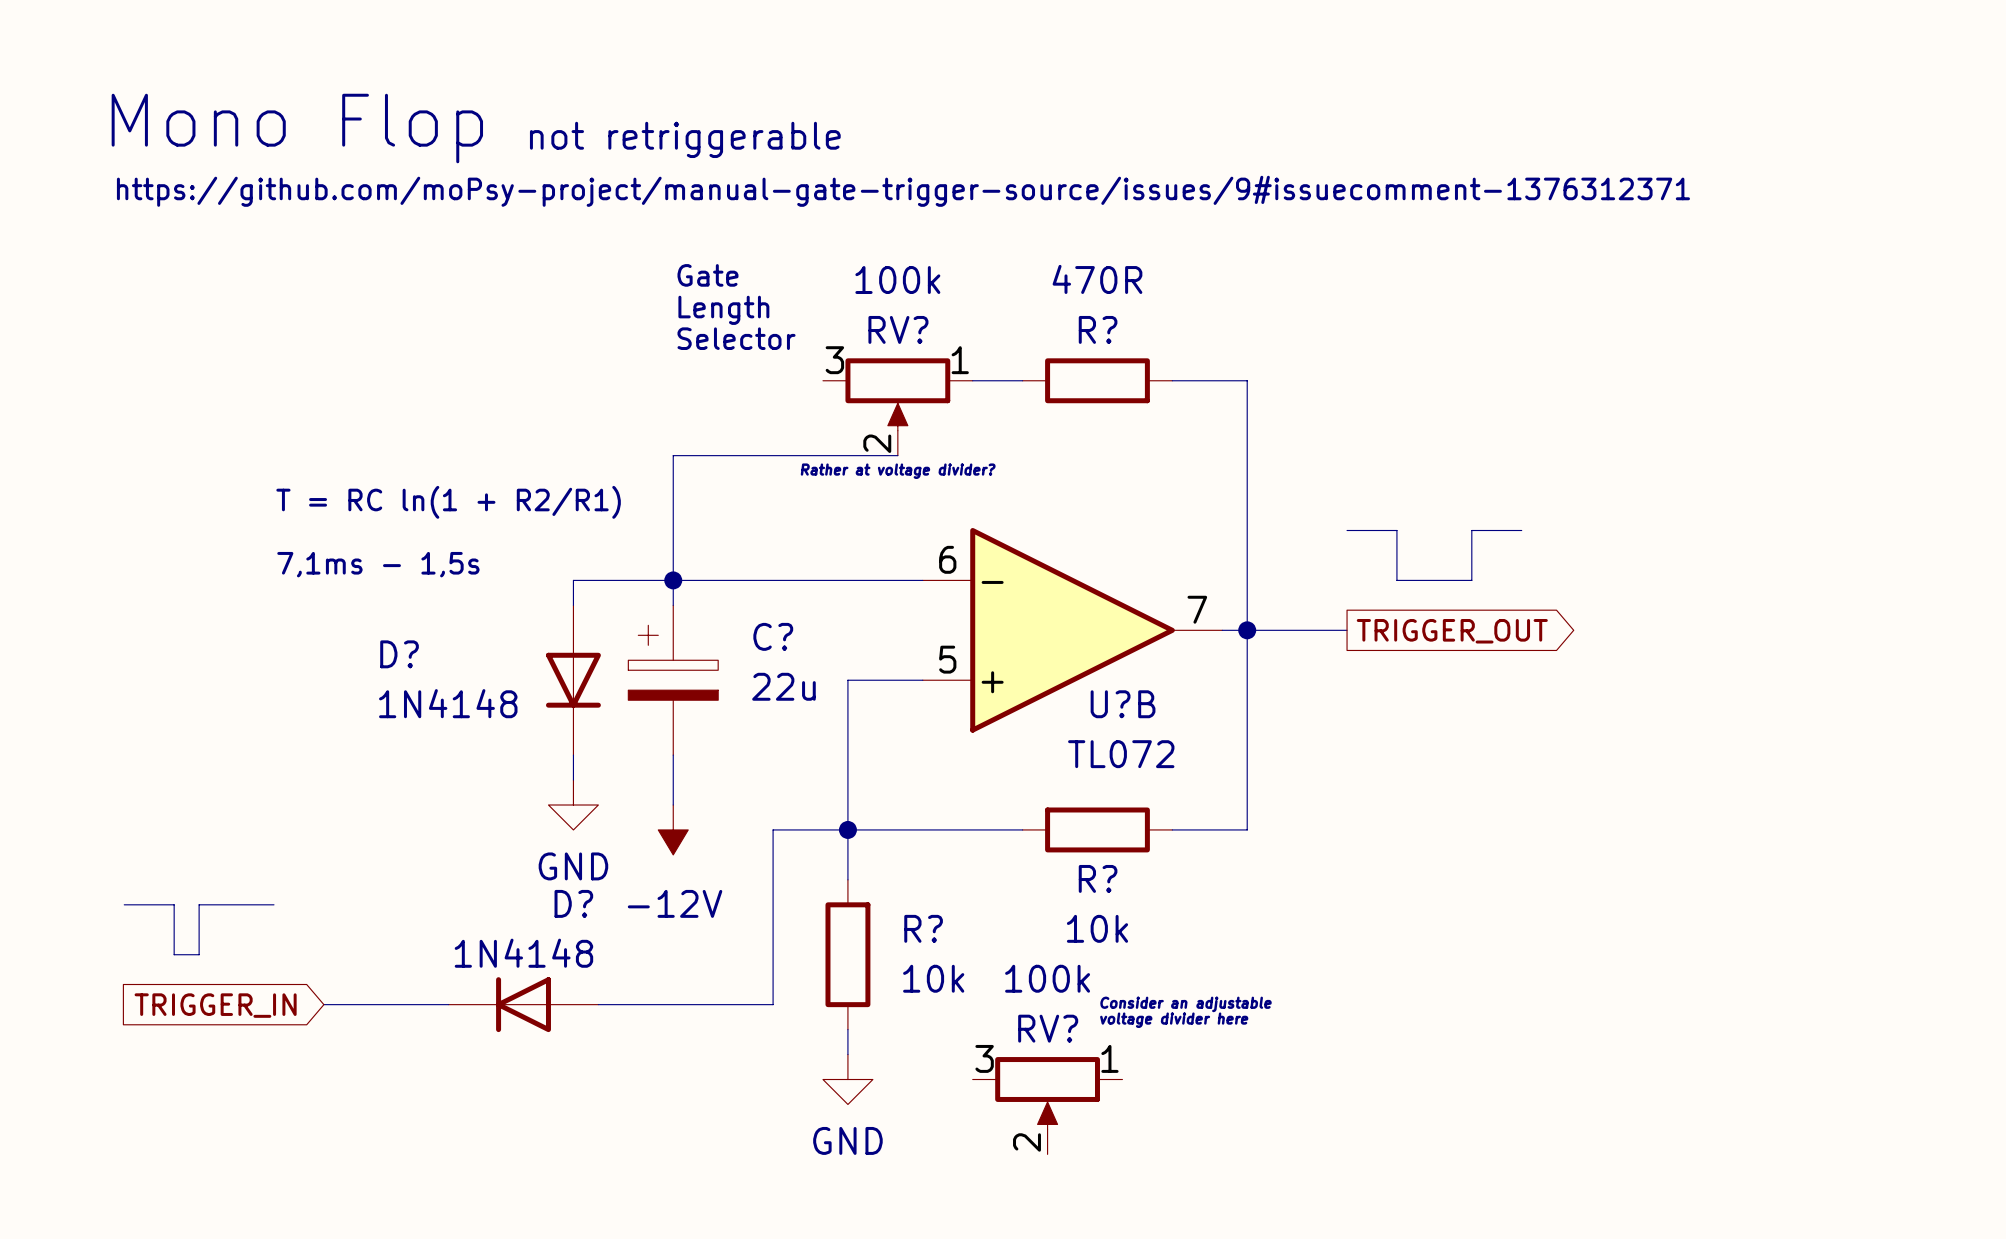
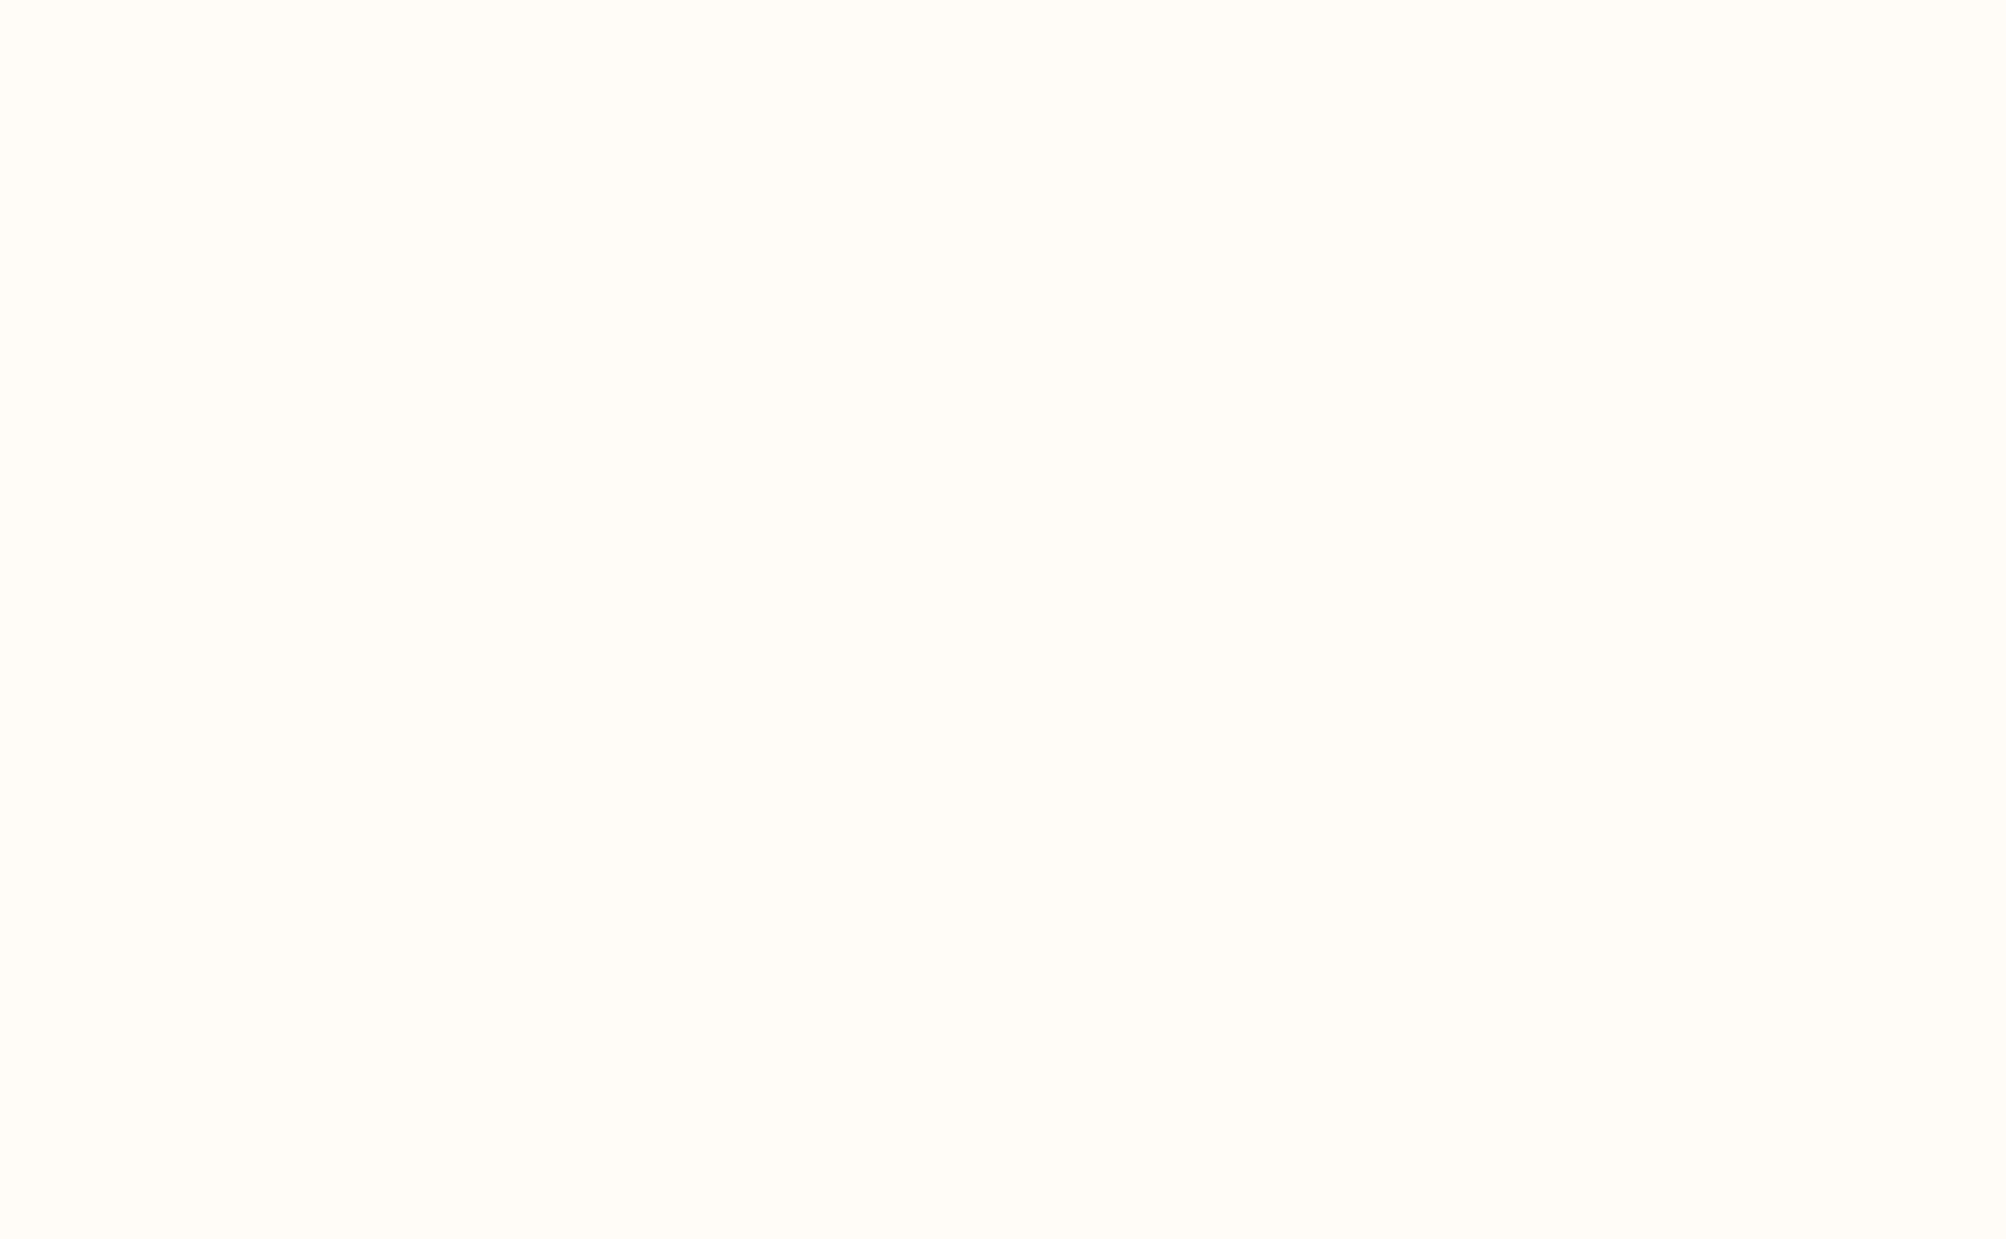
text: Mono Flop (297, 128) -> none
text: not retriggerable (685, 139) -> none
text: https://github.com/moPsy-project/manual-gate-trigger-source/issues/9#issuecomment-1376312371 (903, 191) -> none
text: Gate (707, 275) -> none
text: Length (723, 310) -> none
text: Selector (736, 338) -> none
wire: (972, 380) (1022, 380) -> none
R?: 470R (1097, 380) -> none
wire: (1172, 380) (1247, 380) (1247, 829) (1172, 829) -> none
RV?: 100k (897, 406) -> none
wire: (897, 455) (673, 455) (673, 605) -> none
text: Rather at voltage divider? (898, 471) -> none
text: T = RC ln(1 + R2/R1) (448, 502) -> none
line: (1347, 530) (1396, 530) (1396, 580) (1471, 580) (1471, 530) (1521, 530) -> none
text: 7,1ms - 1,5s (378, 564) -> none
junction: (673, 580) -> none
wire: (922, 580) (573, 580) (573, 605) -> none
U?B: TL072 (1072, 630) -> none
wire: (1222, 630) (1347, 630) -> none
junction: (1247, 630) -> none
global label: TRIGGER_OUT (1452, 631) -> none
D?: 1N4148 (573, 680) -> none
C?: 22u (673, 680) -> none
wire: (922, 680) (847, 680) (847, 879) -> none
wire: (573, 755) (573, 780) -> none
wire: (673, 755) (673, 805) -> none
power symbol: GND (573, 805) -> none
power symbol: -12V (673, 829) -> none
junction: (847, 829) -> none
wire: (1022, 829) (773, 829) (773, 1004) (598, 1004) -> none
R?: 10k (1097, 829) -> none
line: (124, 904) (174, 904) (174, 954) (199, 954) (199, 904) (273, 904) -> none
R?: 10k (847, 954) -> none
wire: (323, 1004) (448, 1004) -> none
D?: 1N4148 (523, 1004) -> none
text: Consider an adjustable (1186, 1004) -> none
global label: TRIGGER_IN (215, 1005) -> none
text: voltage divider here (1174, 1020) -> none
wire: (847, 1029) (847, 1054) -> none
power symbol: GND (847, 1079) -> none
RV?: 100k (1047, 1105) -> none

